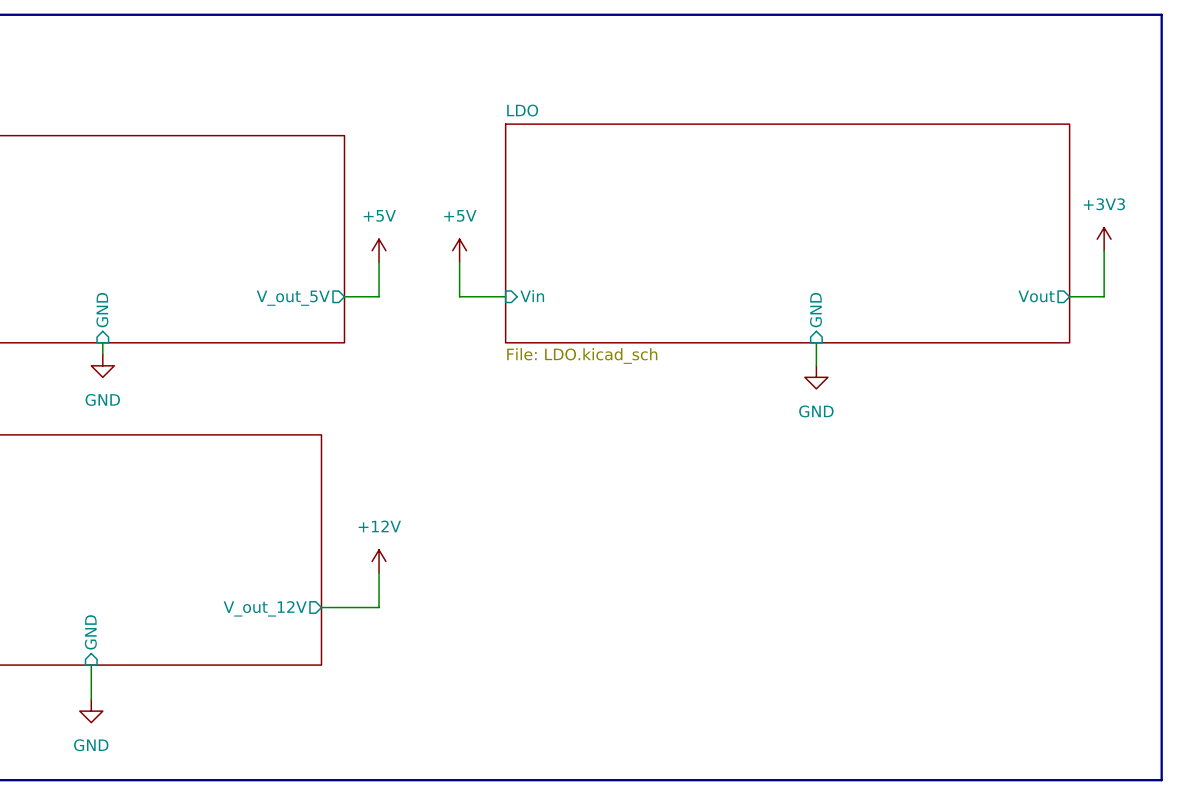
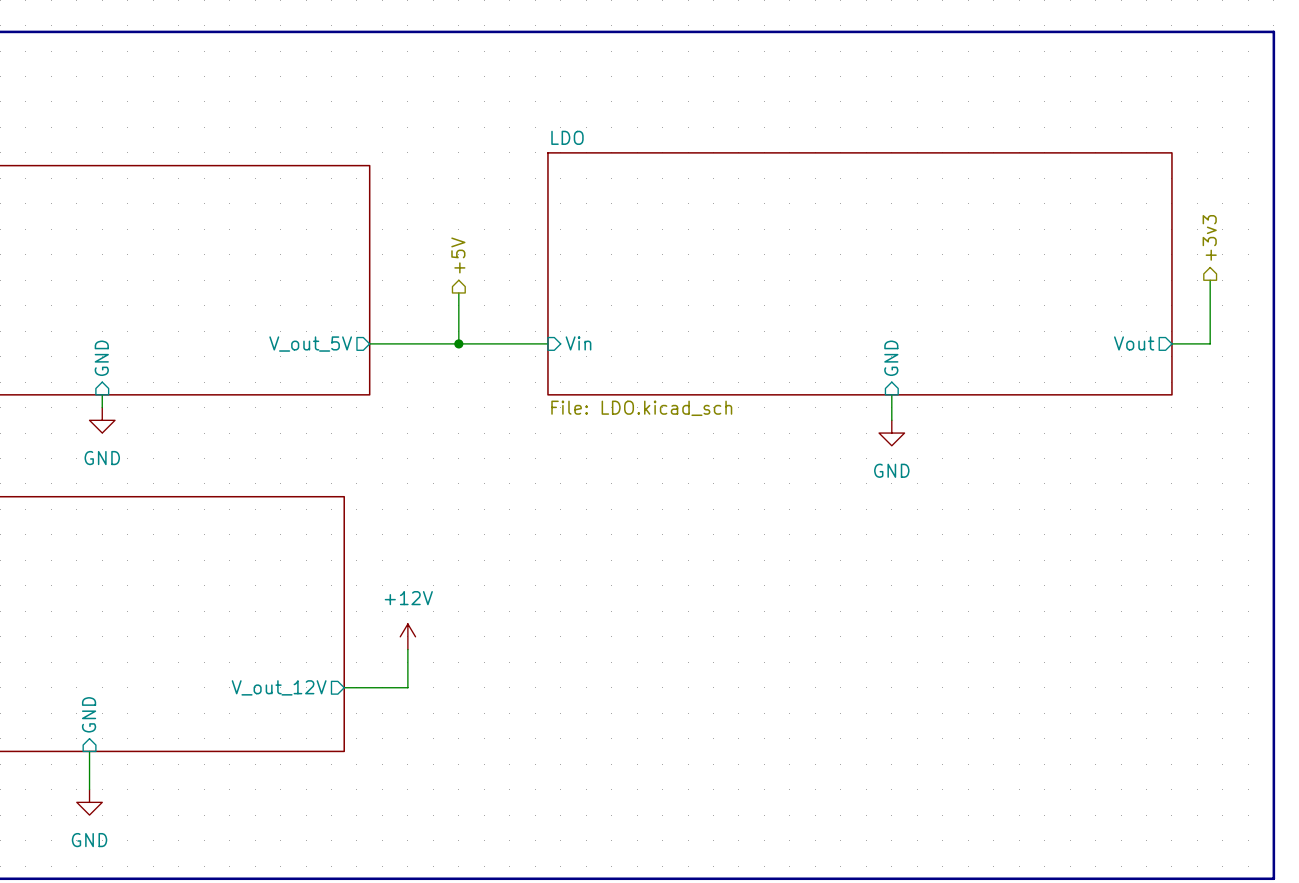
hierarchical label: none -> +3v3 (1209, 237)
hierarchical label: none -> +5V (458, 255)
power symbol: +3V3 (1104, 239) -> none
power symbol: +5V (379, 250) -> none
wire: none -> (458, 292) (458, 343)
power symbol: +5V (459, 250) -> none
wire: (379, 262) (379, 296) -> (497, 343) (407, 343)
wire: (459, 262) (459, 296) -> none
junction: none -> (458, 343)

